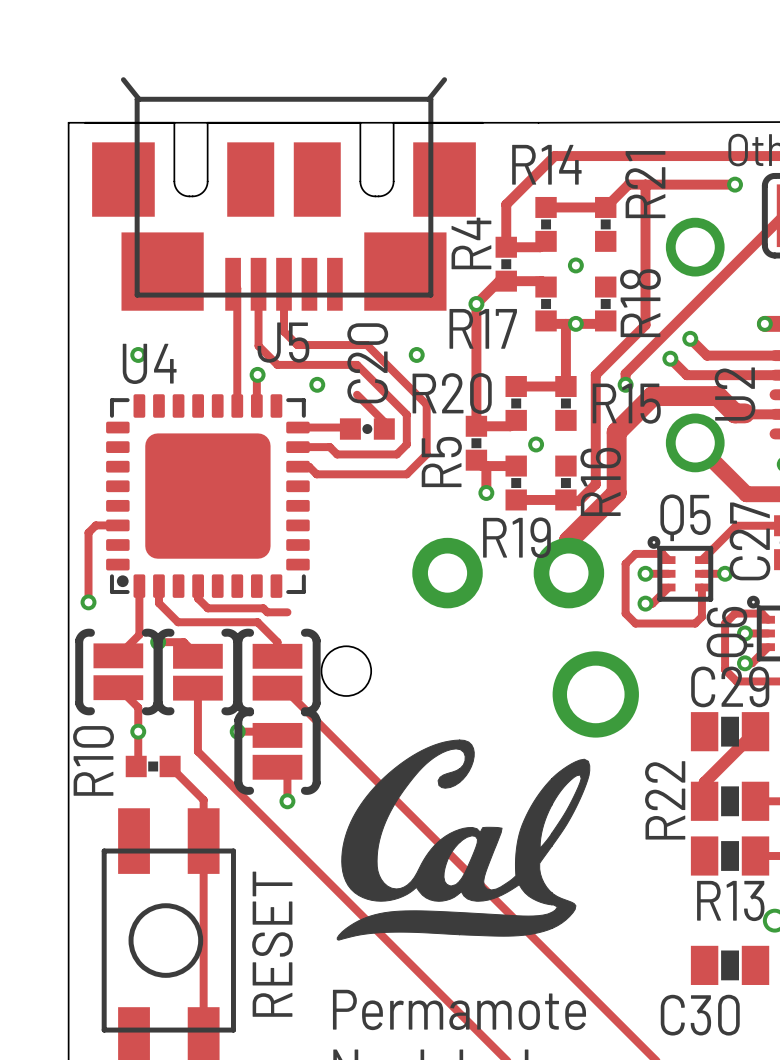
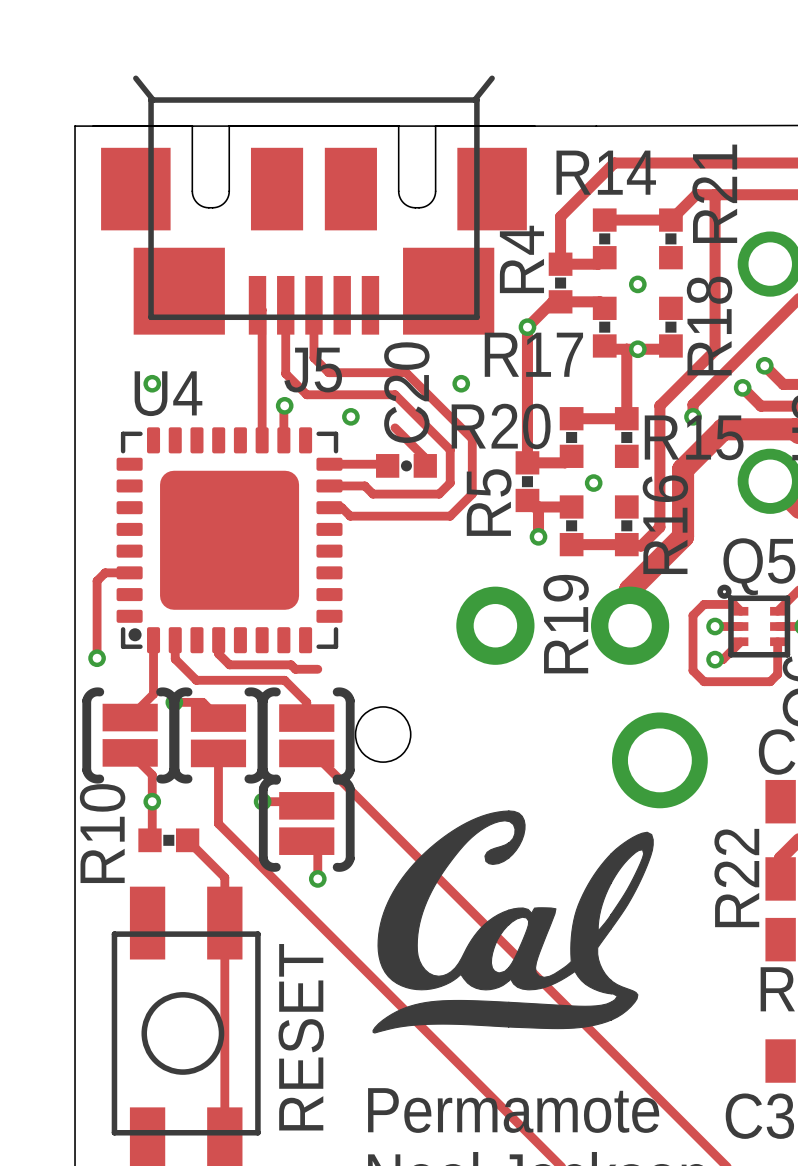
R19 name rotation: 0° (516, 537) -> 90° counterclockwise (566, 624)

